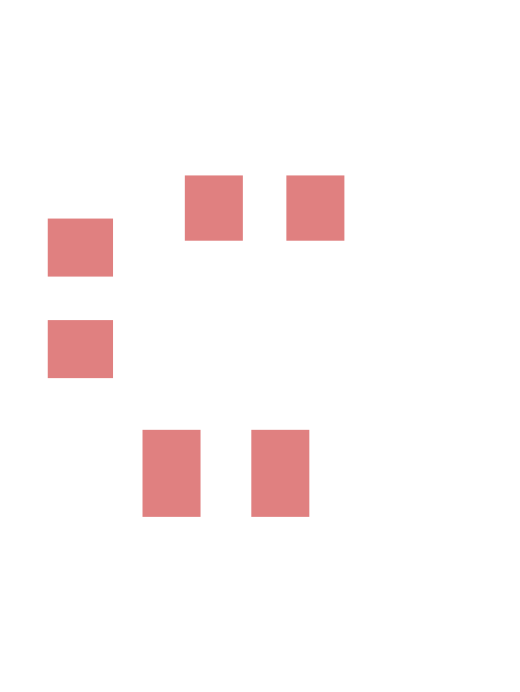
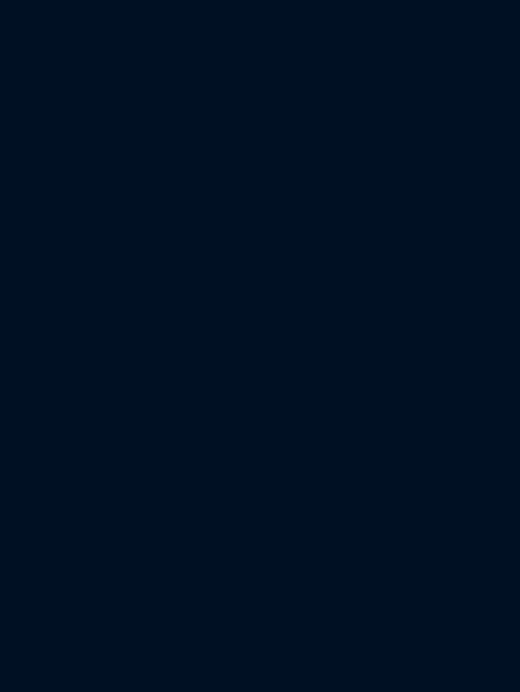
part: (264, 208) -> none
part: (80, 298) -> none
part: (225, 473) -> none

